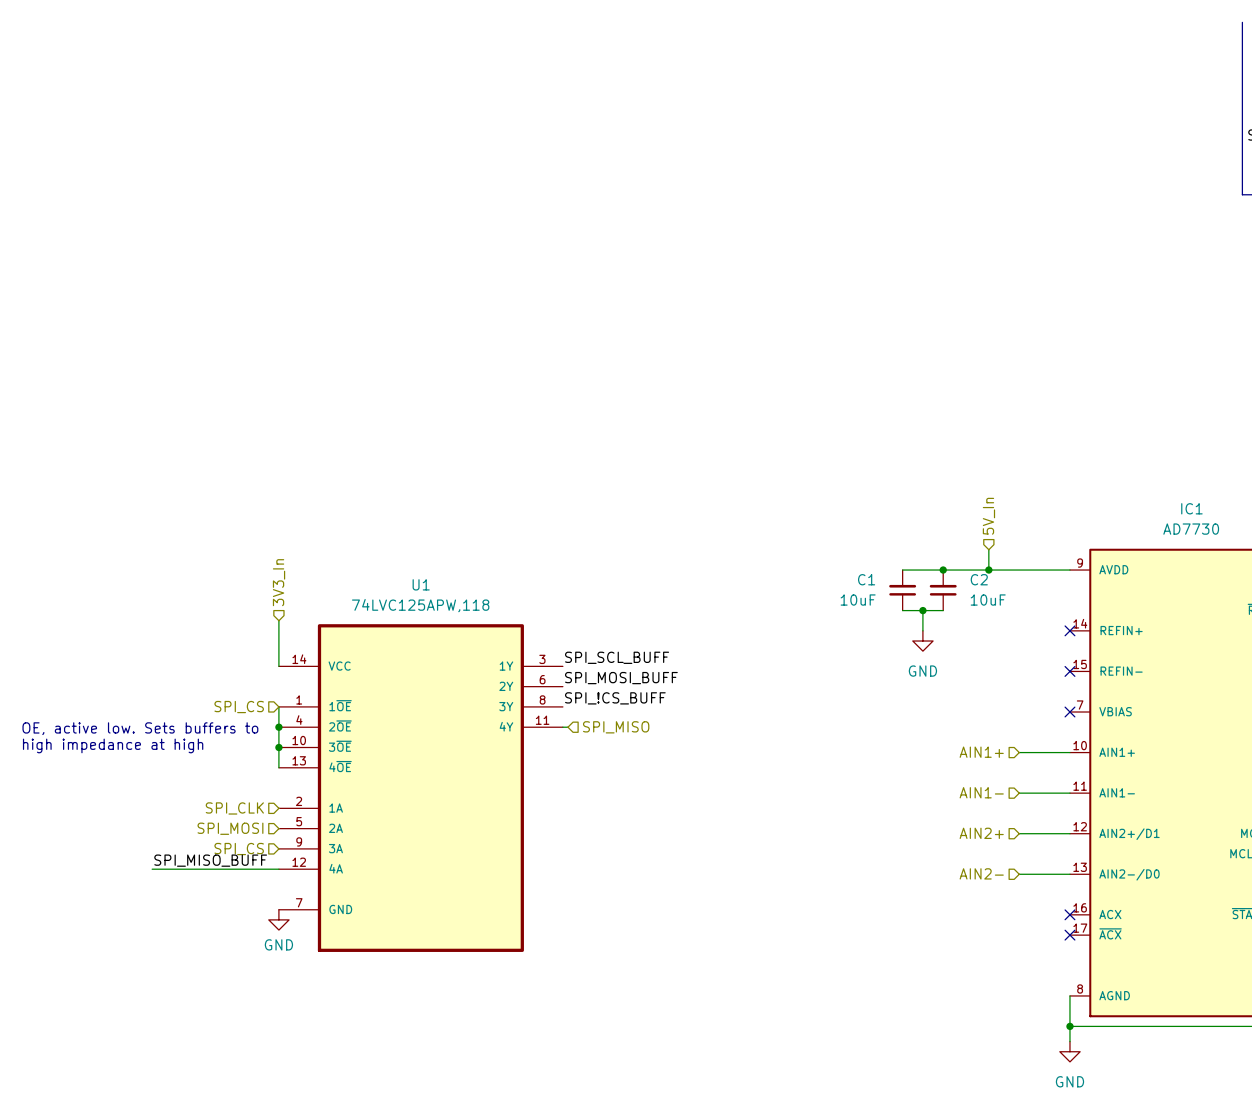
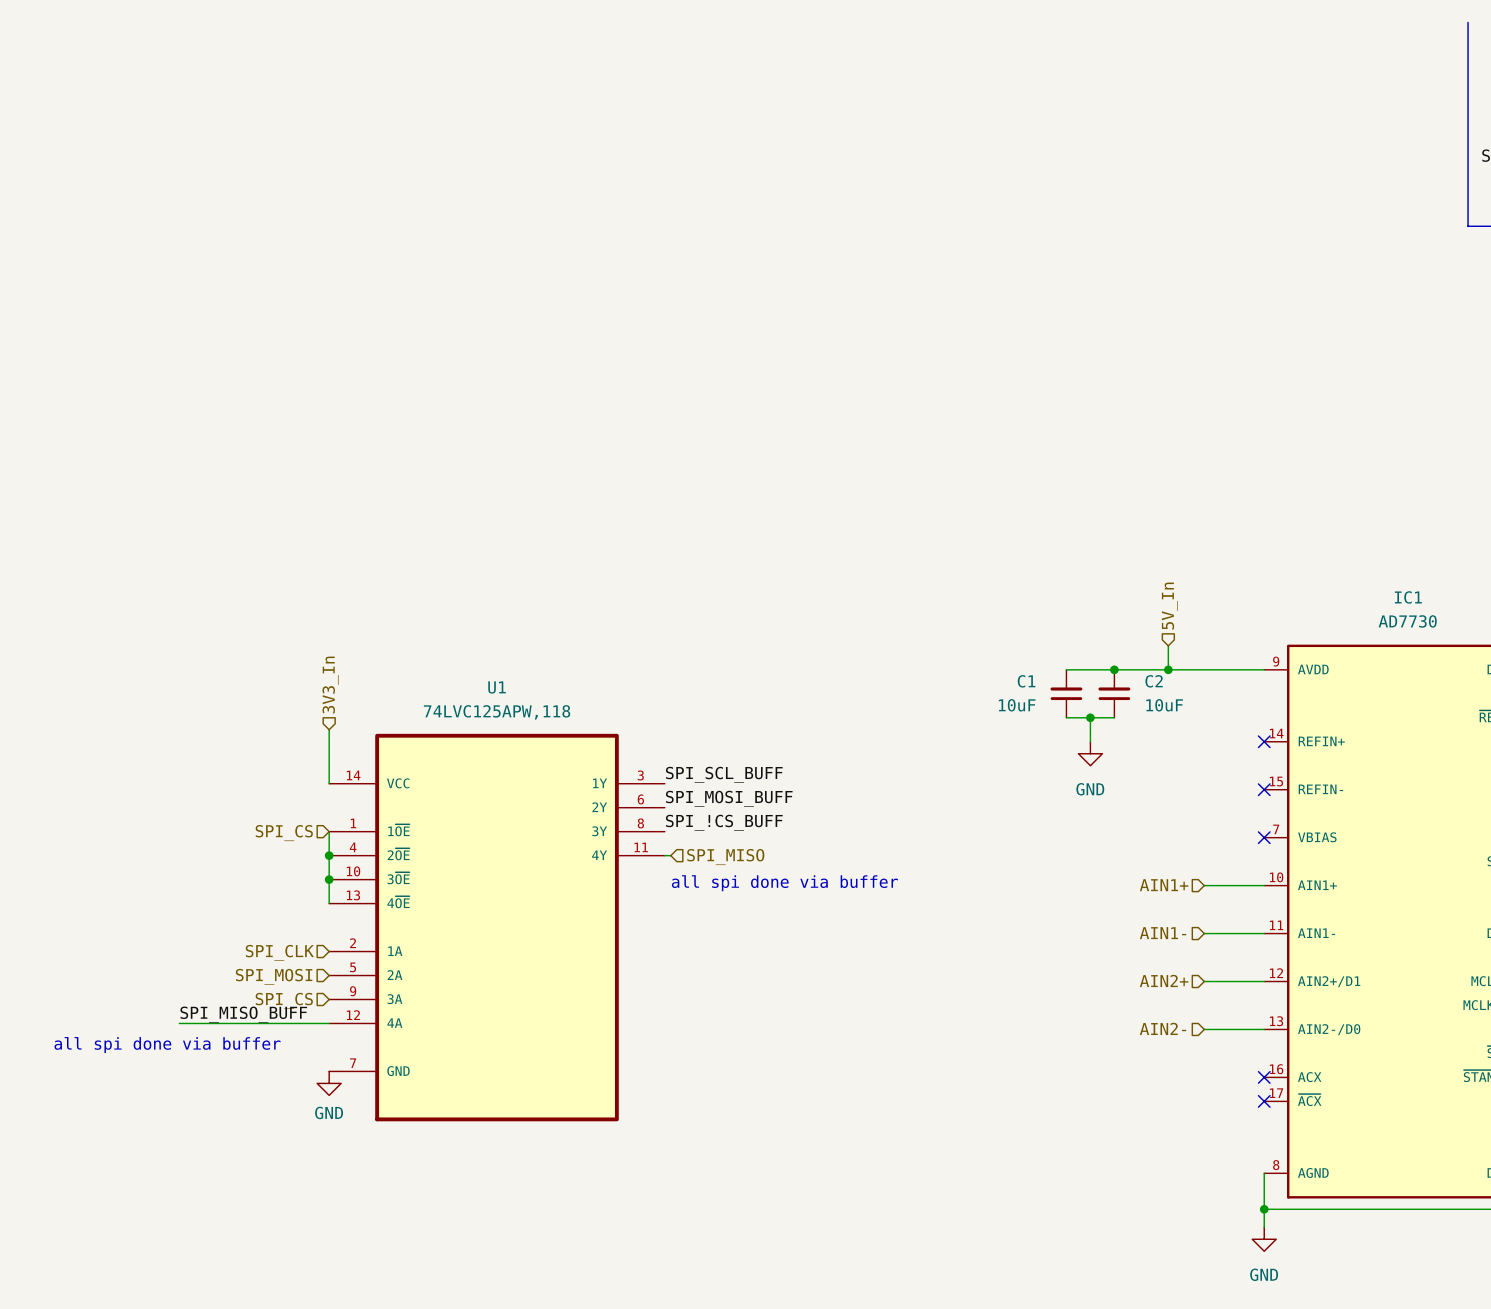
text: OE, active low. Sets buffers to (140, 728) -> none
text: high impedance at high (113, 745) -> none
text: none -> all spi done via buffer (784, 883)
text: none -> all spi done via buffer (167, 1045)

